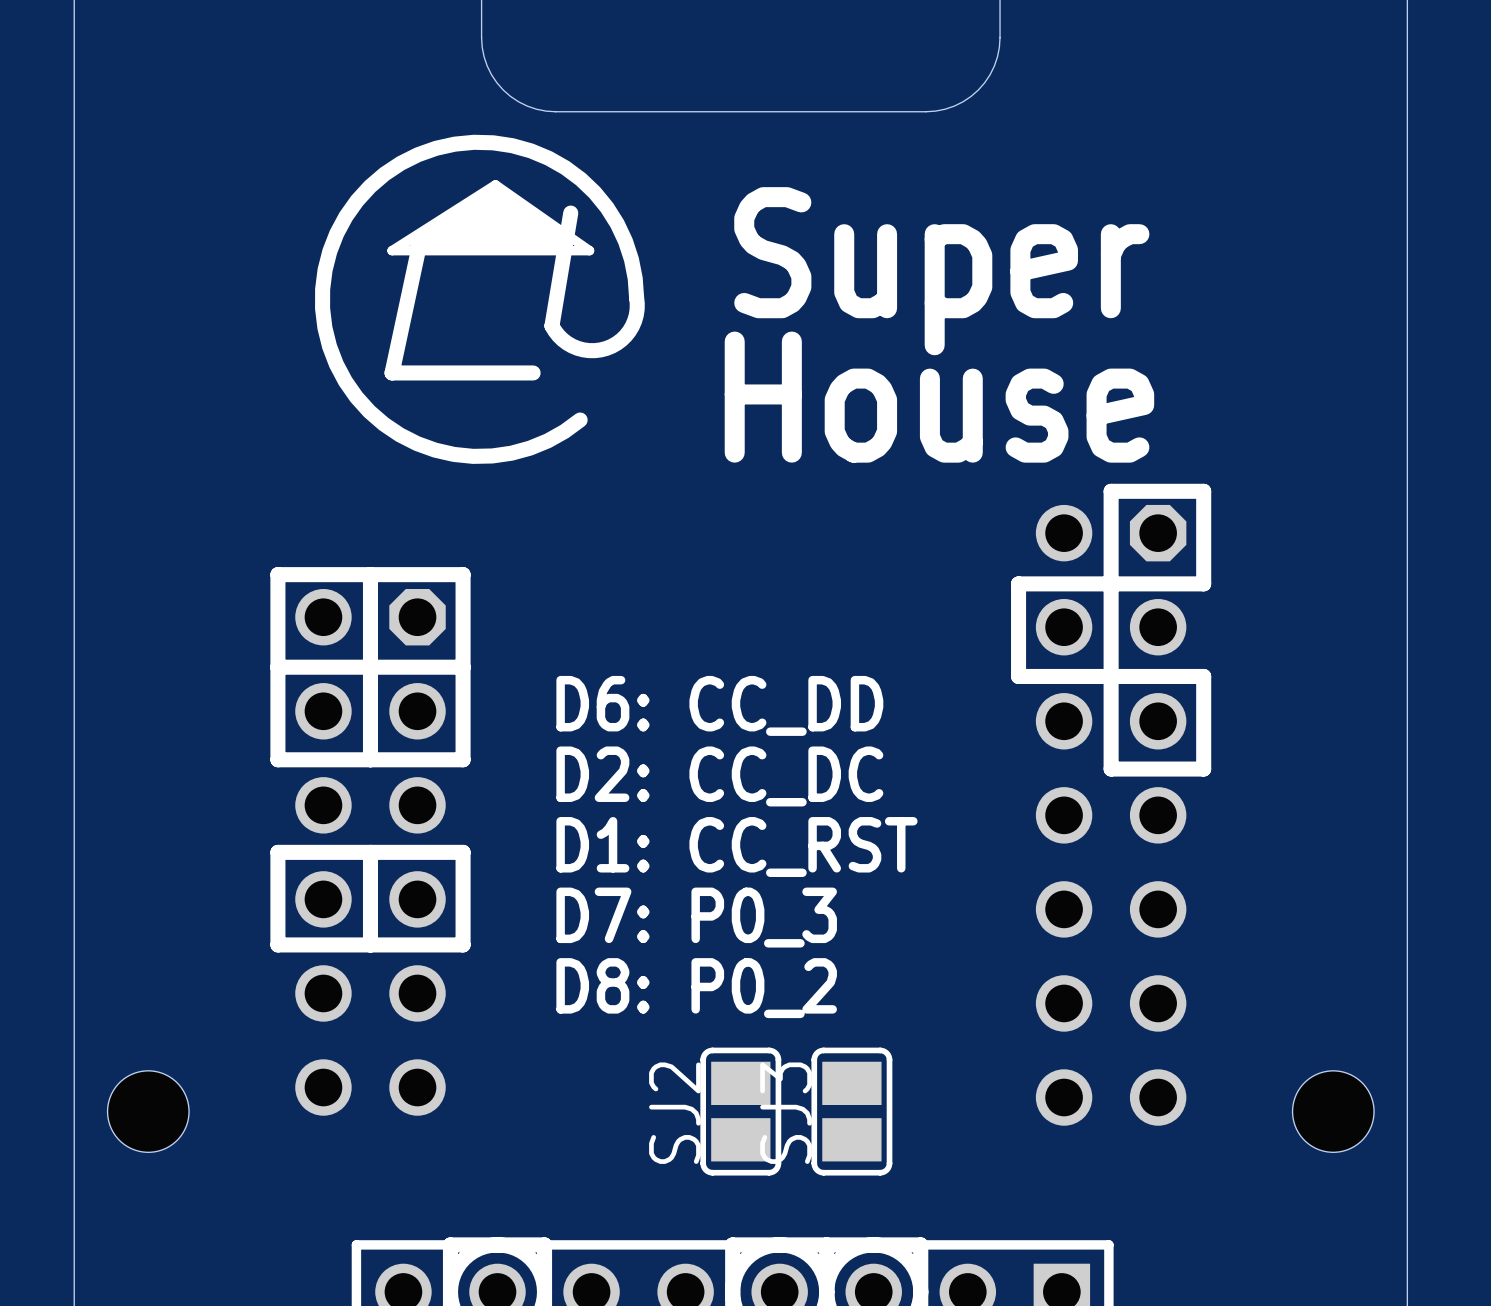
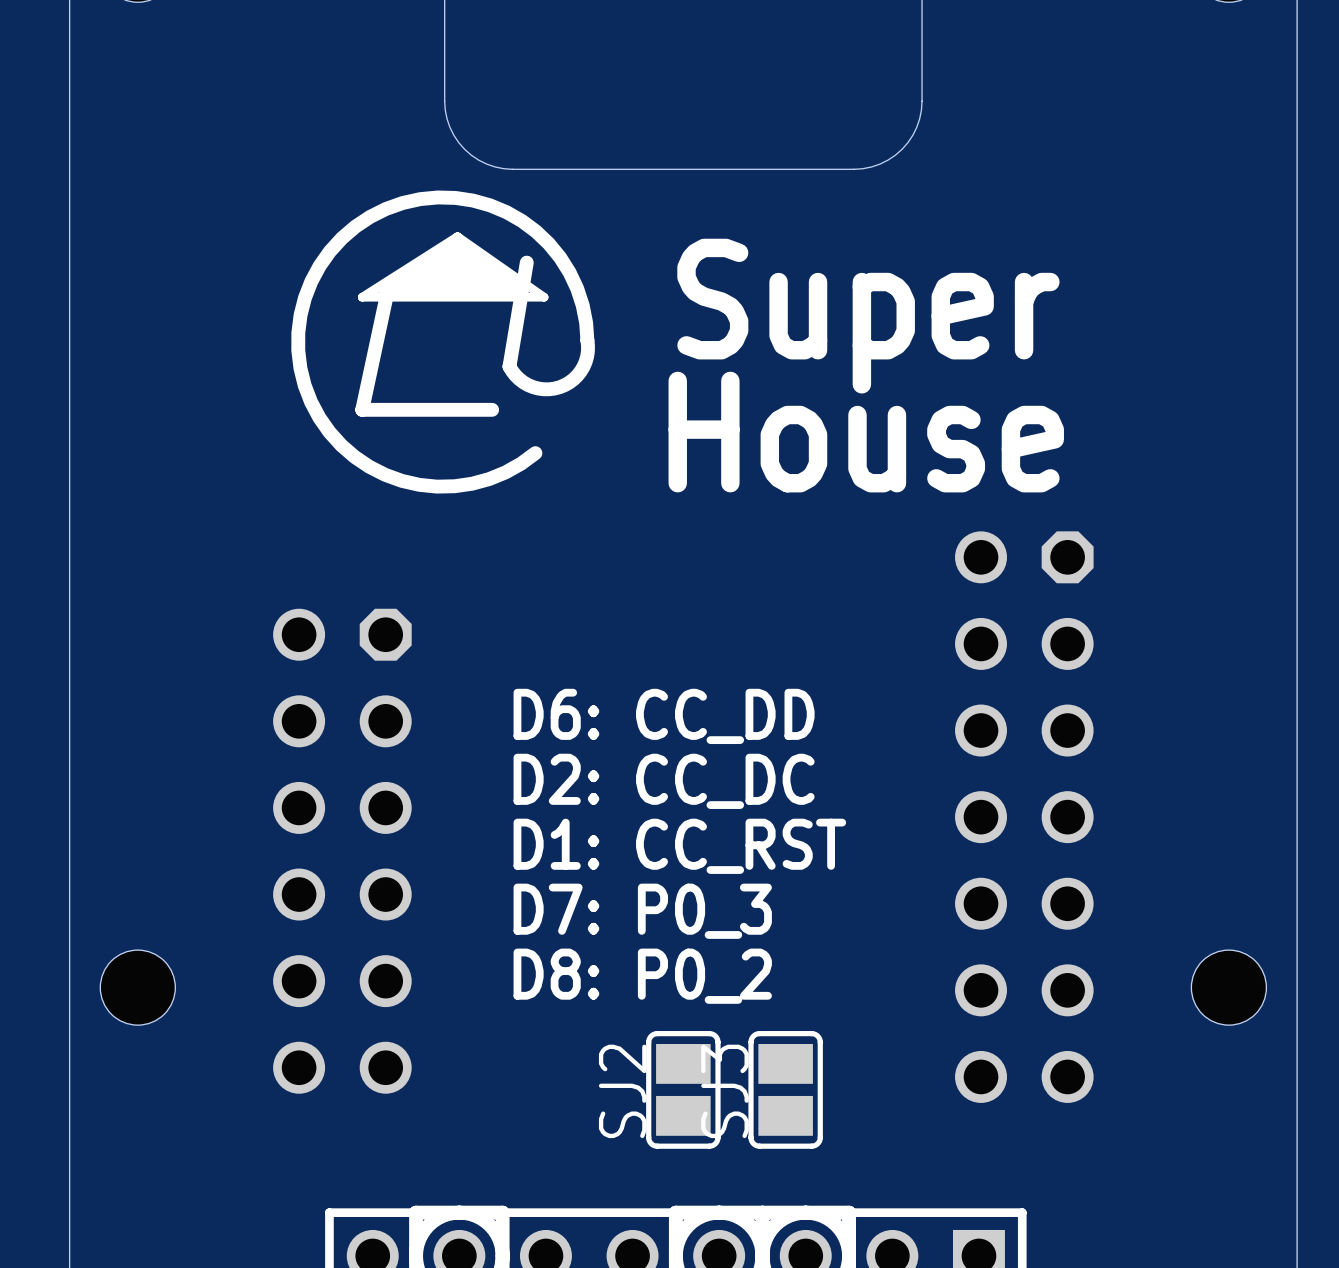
line: (1203, 491) (1203, 583) (1018, 583) (1018, 676) (1203, 676) (1203, 769) (1111, 769) (1111, 491) (1203, 491) -> none
line: (370, 574) (370, 759) -> none
line: (463, 574) (463, 759) (277, 759) (277, 574) (463, 574) -> none
line: (463, 667) (277, 667) -> none
line: (370, 852) (370, 944) -> none
line: (463, 852) (463, 944) (277, 944) (277, 852) (463, 852) -> none
hole position: (148, 1111) -> (137, 987)
hole position: (1333, 1111) -> (1228, 987)

